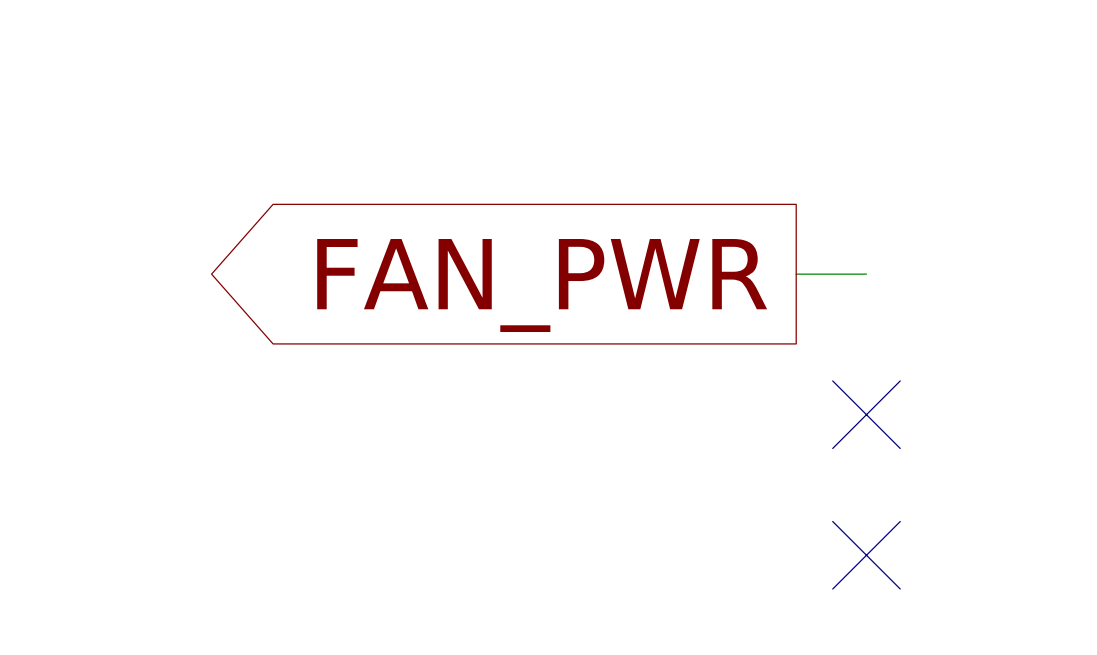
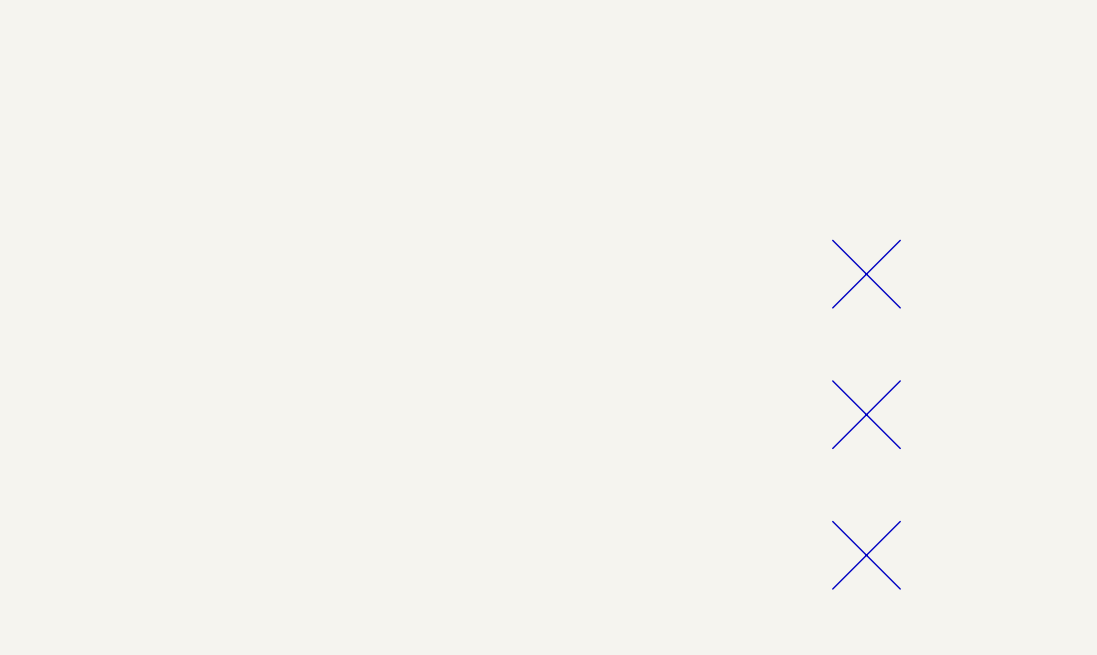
wire: (796, 274) (866, 274) -> none
no-connect mark: none -> (866, 274)
global label: FAN_PWR (542, 285) -> none

